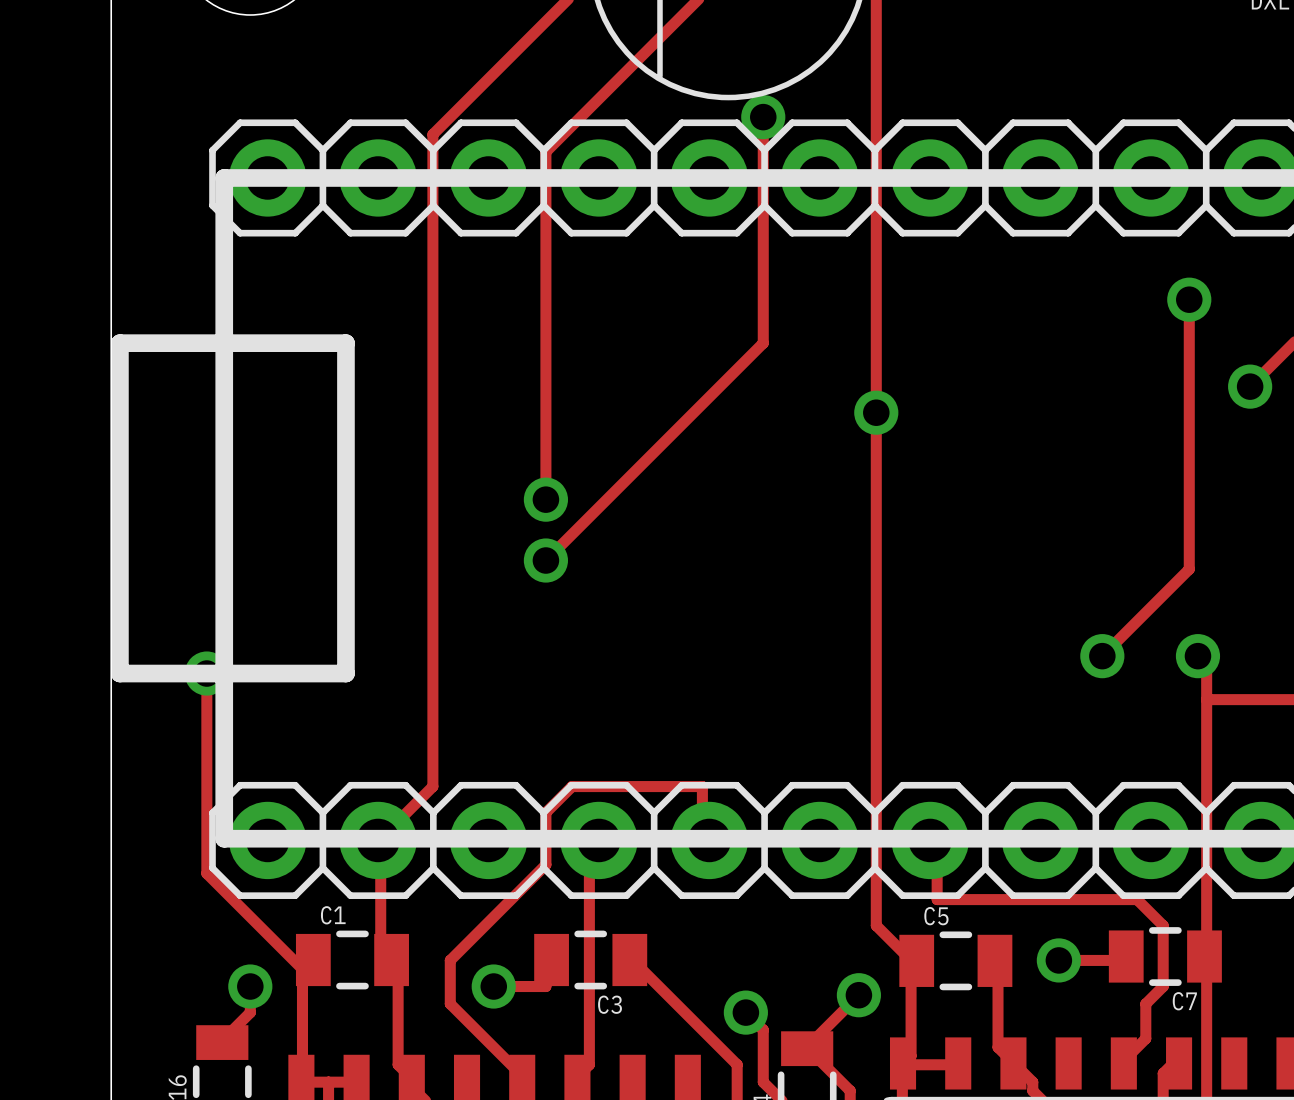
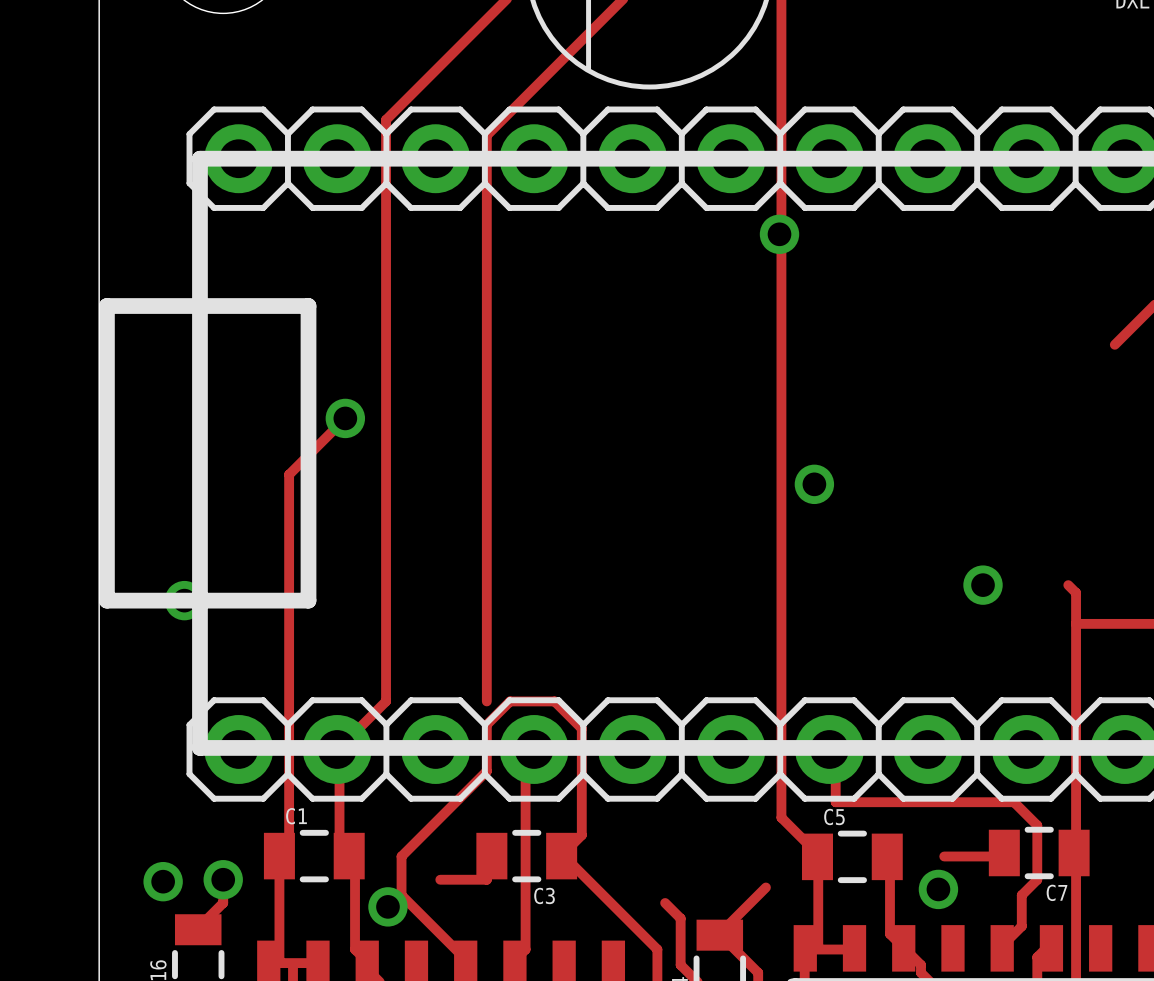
track: (763, 117) (763, 343) (545, 560) -> none
via: (763, 117) -> none
via: none -> (779, 234)
track: (1189, 299) (1189, 569) (1102, 656) -> none
via: (1189, 299) -> none
via: (1250, 386) -> none
via: (876, 412) -> none
via: none -> (345, 418)
track: none -> (486, 445) (486, 701)
via: (545, 499) -> none
via: none -> (814, 484)
via: (545, 560) -> none
via: (1197, 656) -> none
track: (206, 673) (206, 873) (302, 969) -> none
track: (621, 786) (702, 786) (702, 838) (709, 840) -> (554, 701) (581, 728) (581, 835) (561, 856)
track: (876, 916) (876, 925) (911, 960) (916, 960) (911, 969) (911, 1056) (903, 1063) -> (781, 817) (816, 852) (818, 858) (818, 947)
via position: (1058, 960) -> (938, 889)
track: (302, 969) (301, 1080) (356, 1080) -> (345, 418) (289, 474) (289, 844) (279, 856) (279, 959) (268, 963) (318, 963)
via position: (493, 986) -> (387, 906)
via: none -> (163, 881)
via: (858, 995) -> none
via: (745, 1012) -> none

